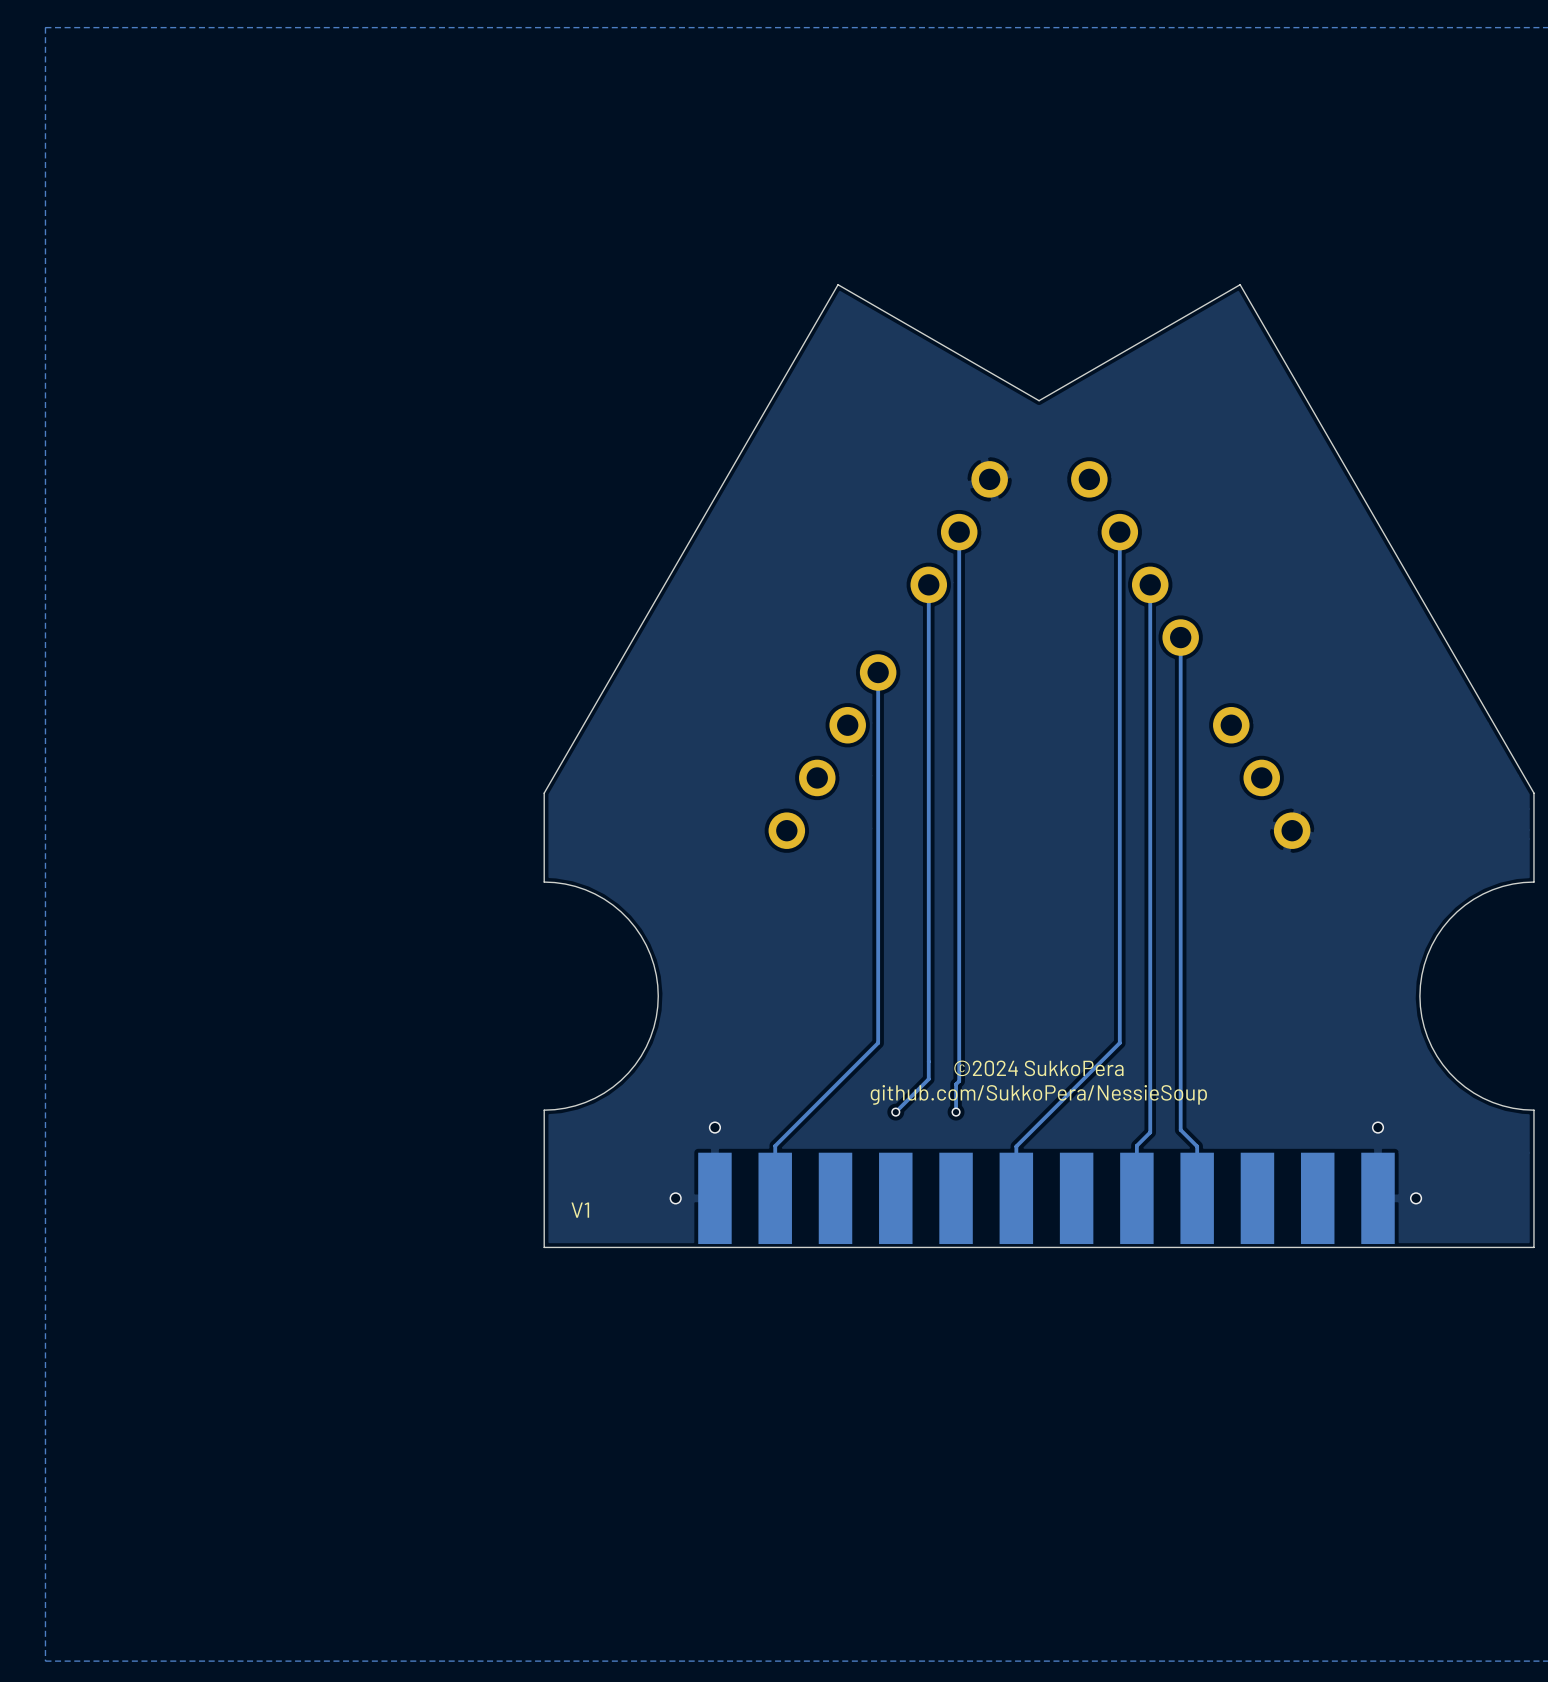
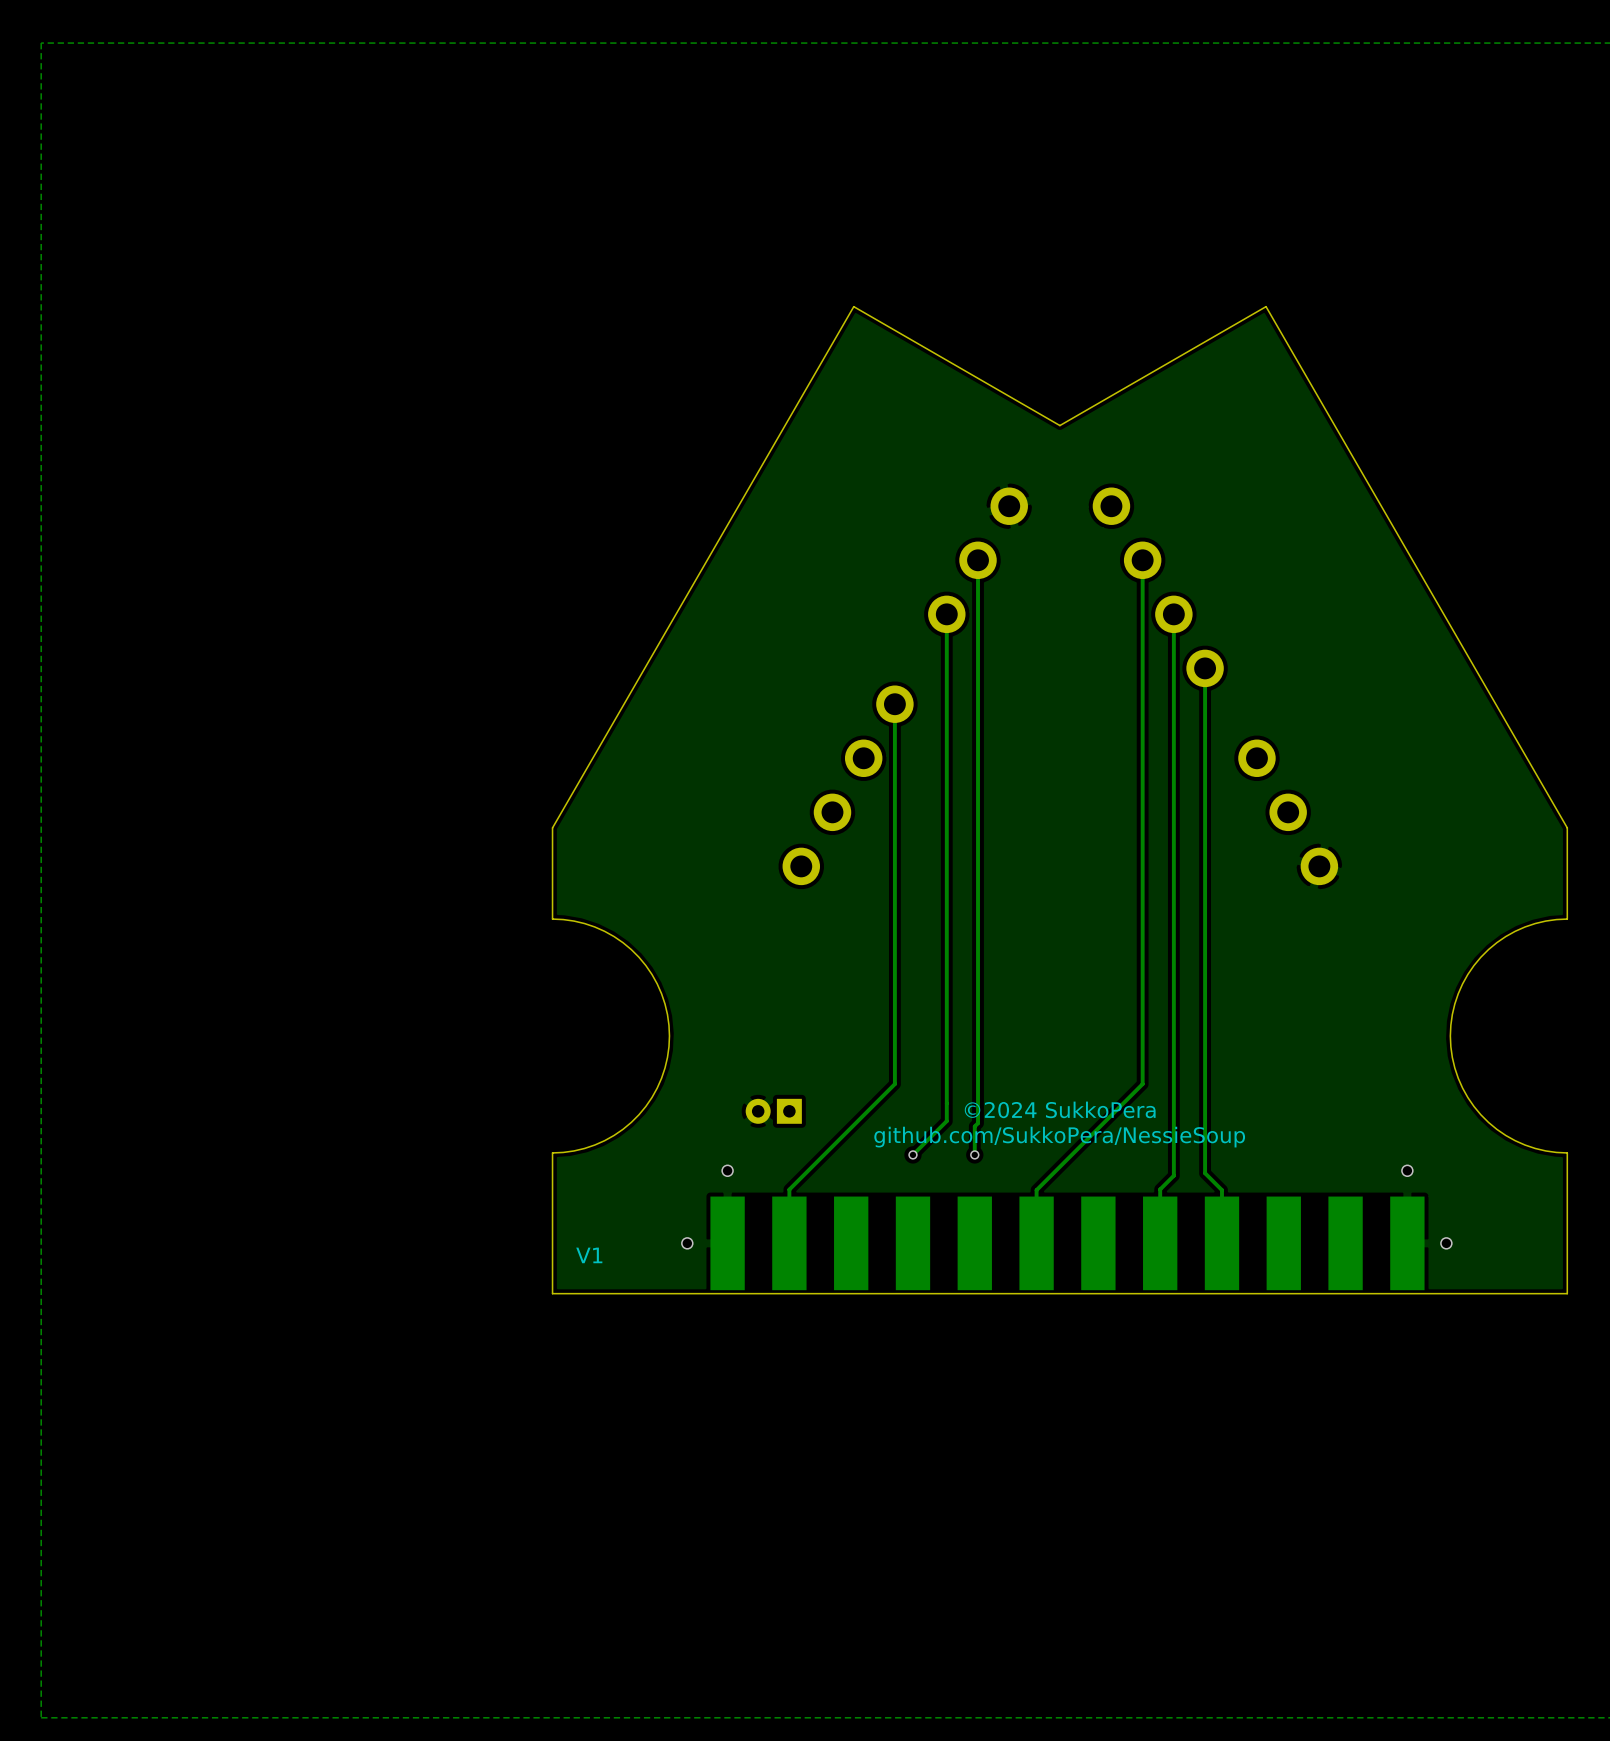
part: none -> (773, 1111)

